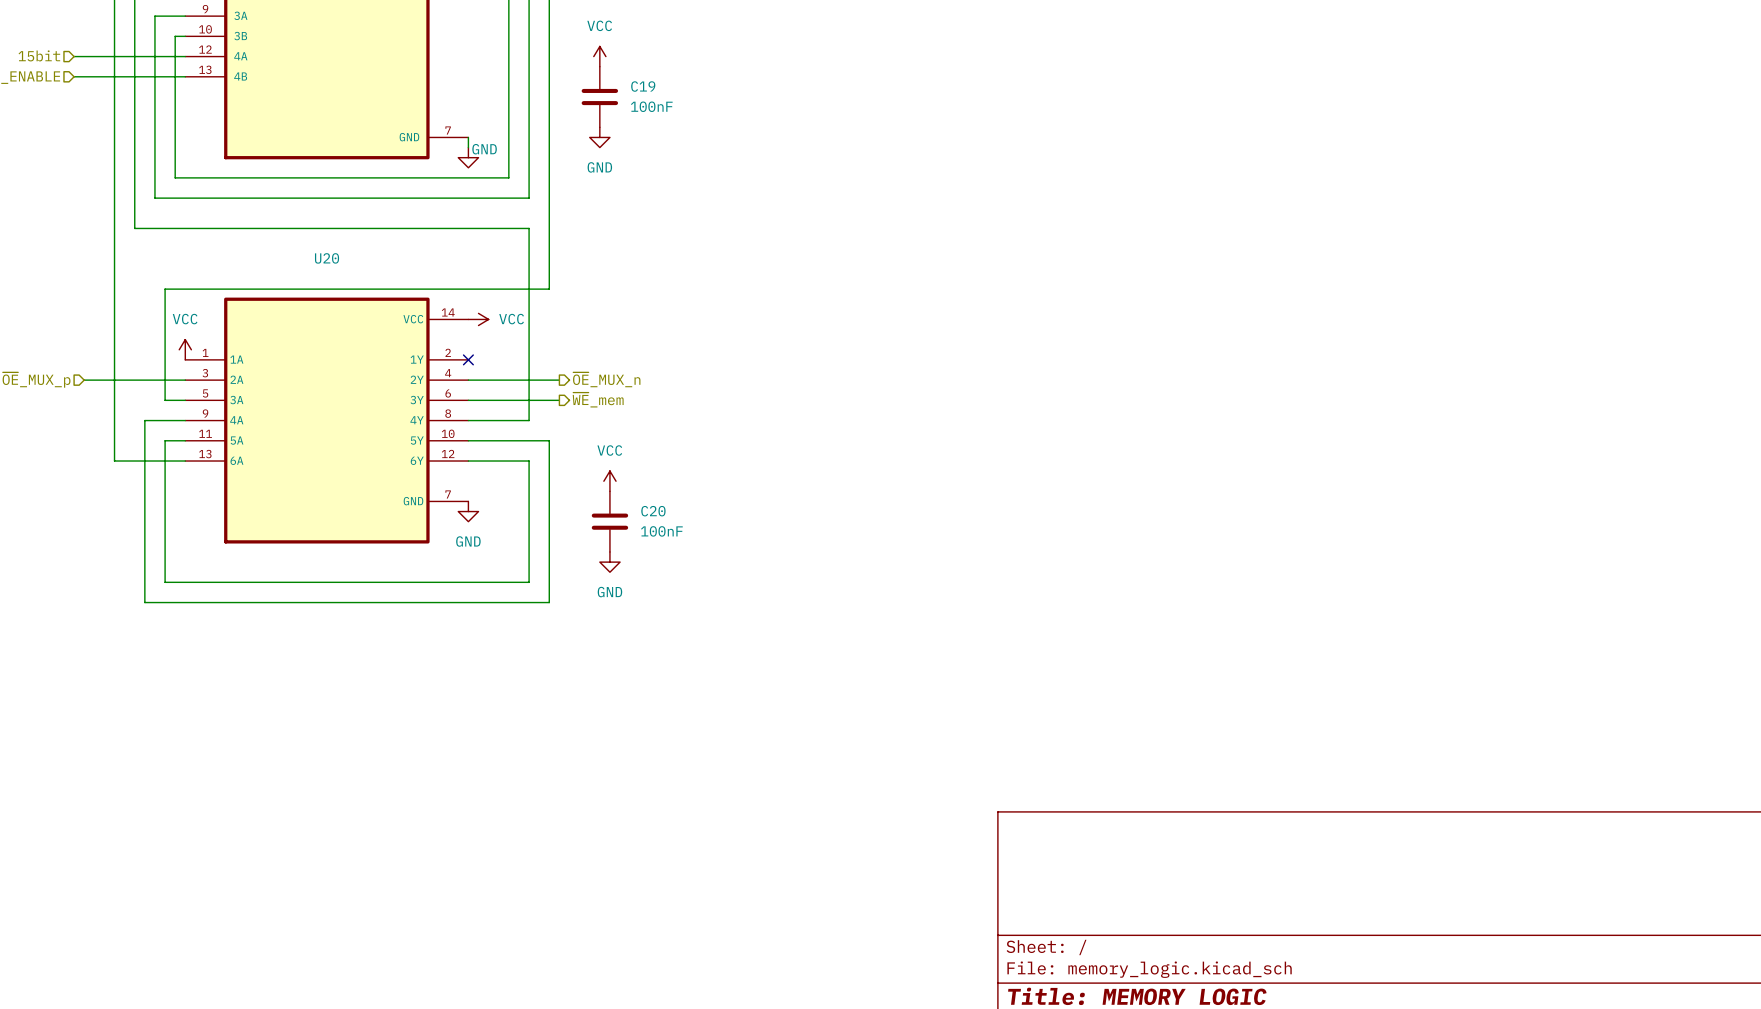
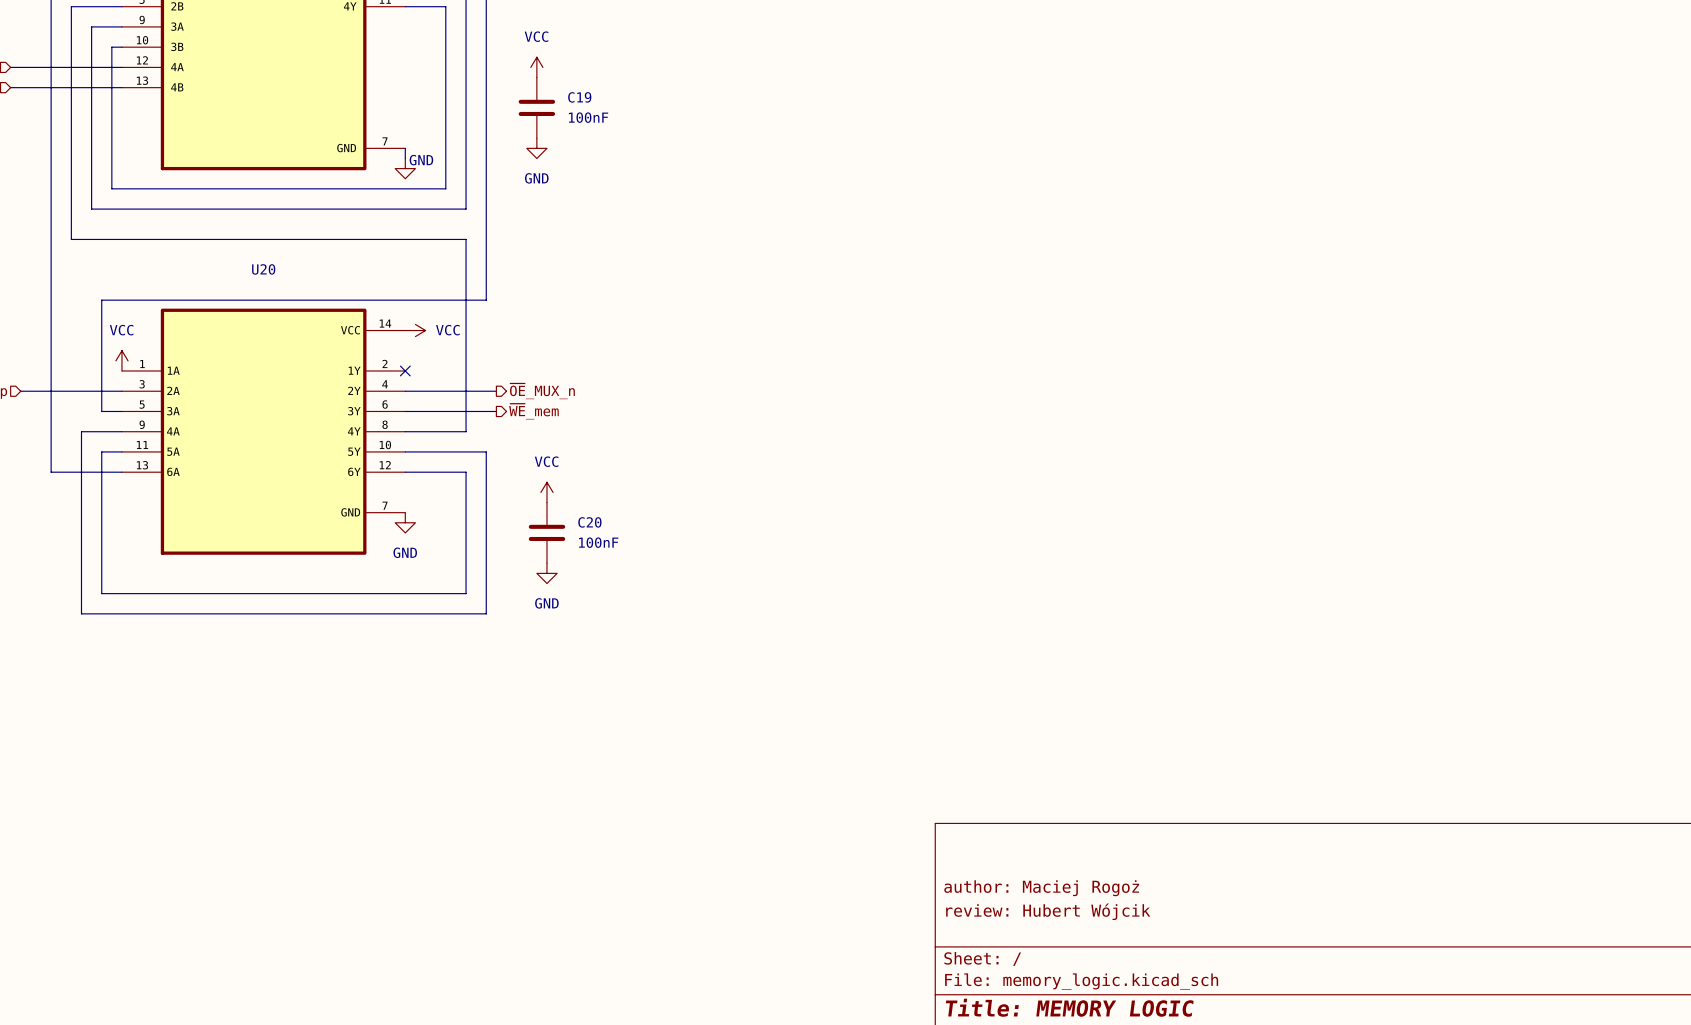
title block: none -> author: Maciej Rogoż (1041, 888)
title block: none -> review: Hubert Wójcik (1048, 911)

